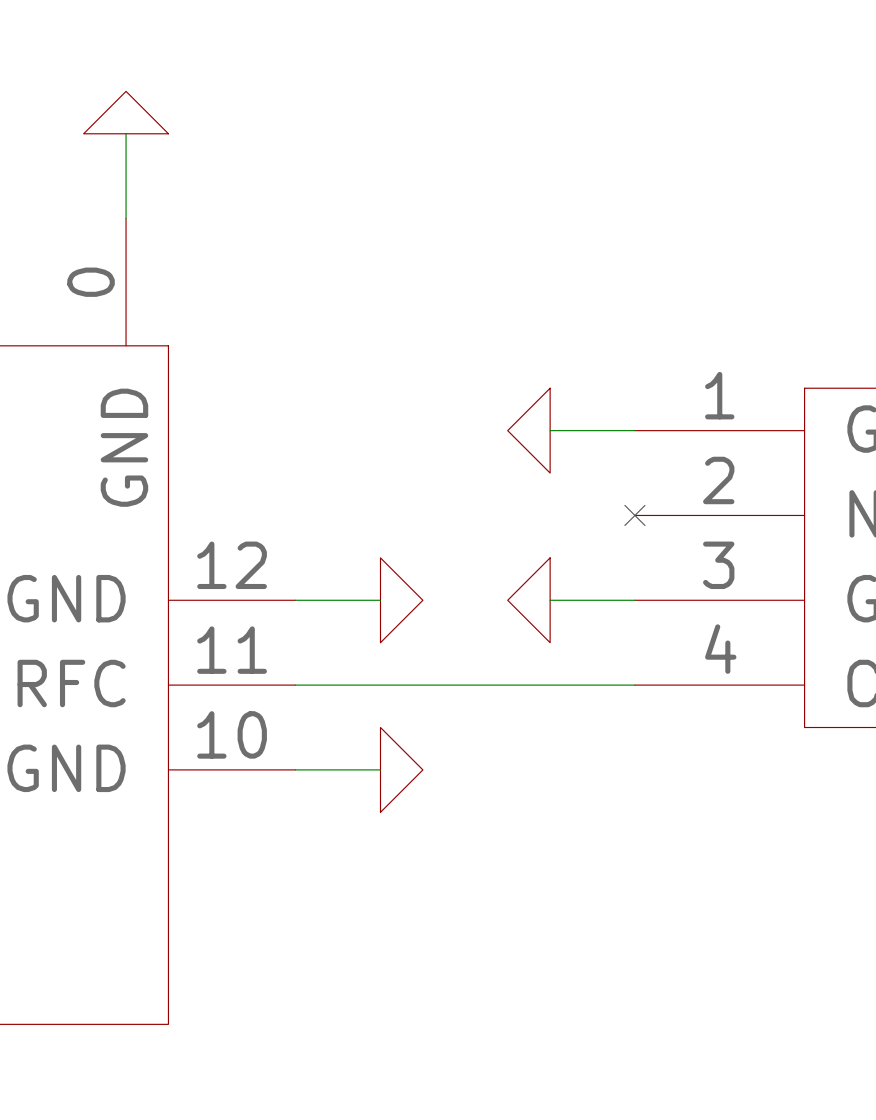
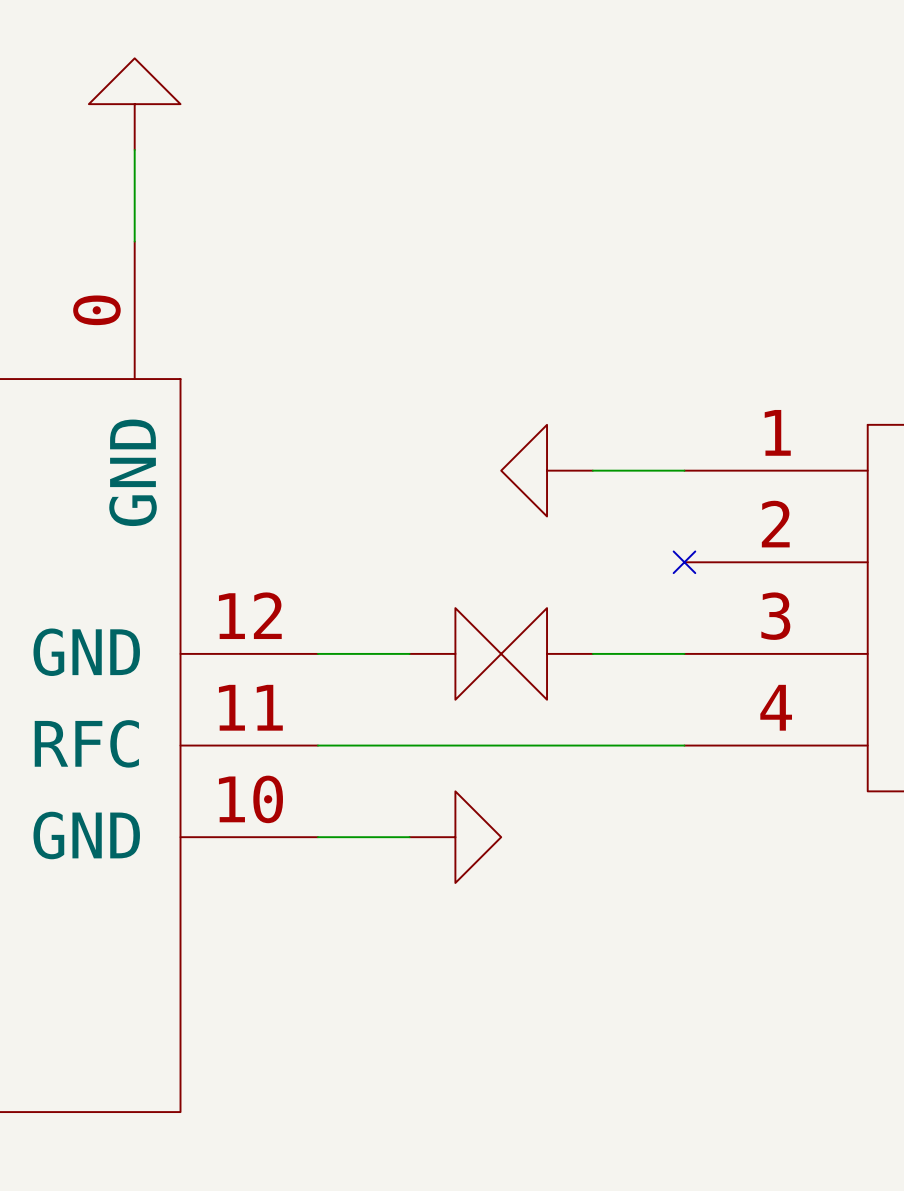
power symbol shape: [83, 91, 169, 134] -> [88, 58, 181, 150]
power symbol shape: [507, 388, 551, 474] -> [501, 424, 593, 517]
power symbol shape: [380, 557, 423, 643] -> [409, 608, 502, 700]
power symbol shape: [507, 557, 551, 643] -> [501, 608, 593, 700]
power symbol shape: [380, 727, 423, 813] -> [409, 791, 502, 883]

